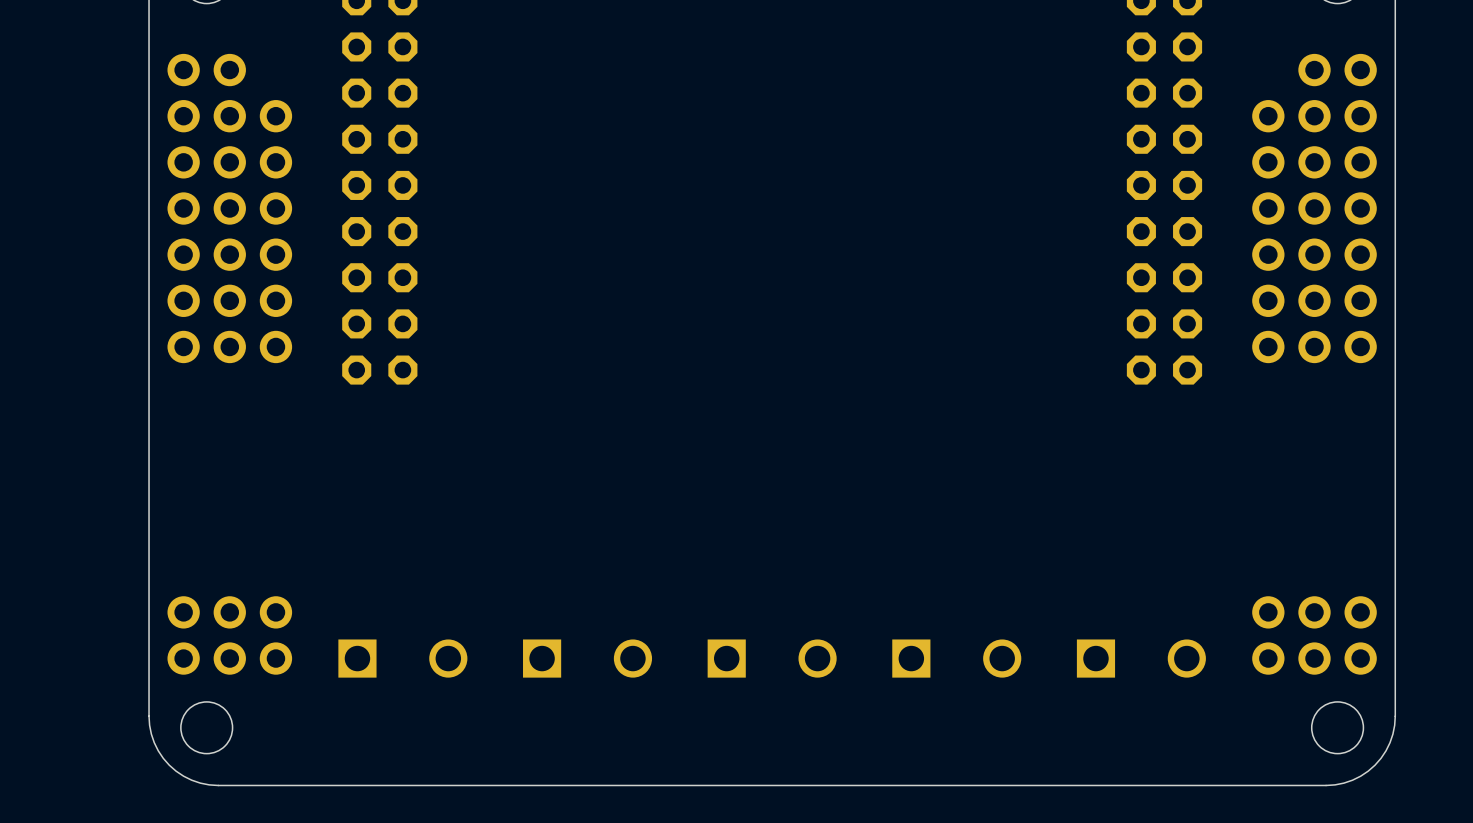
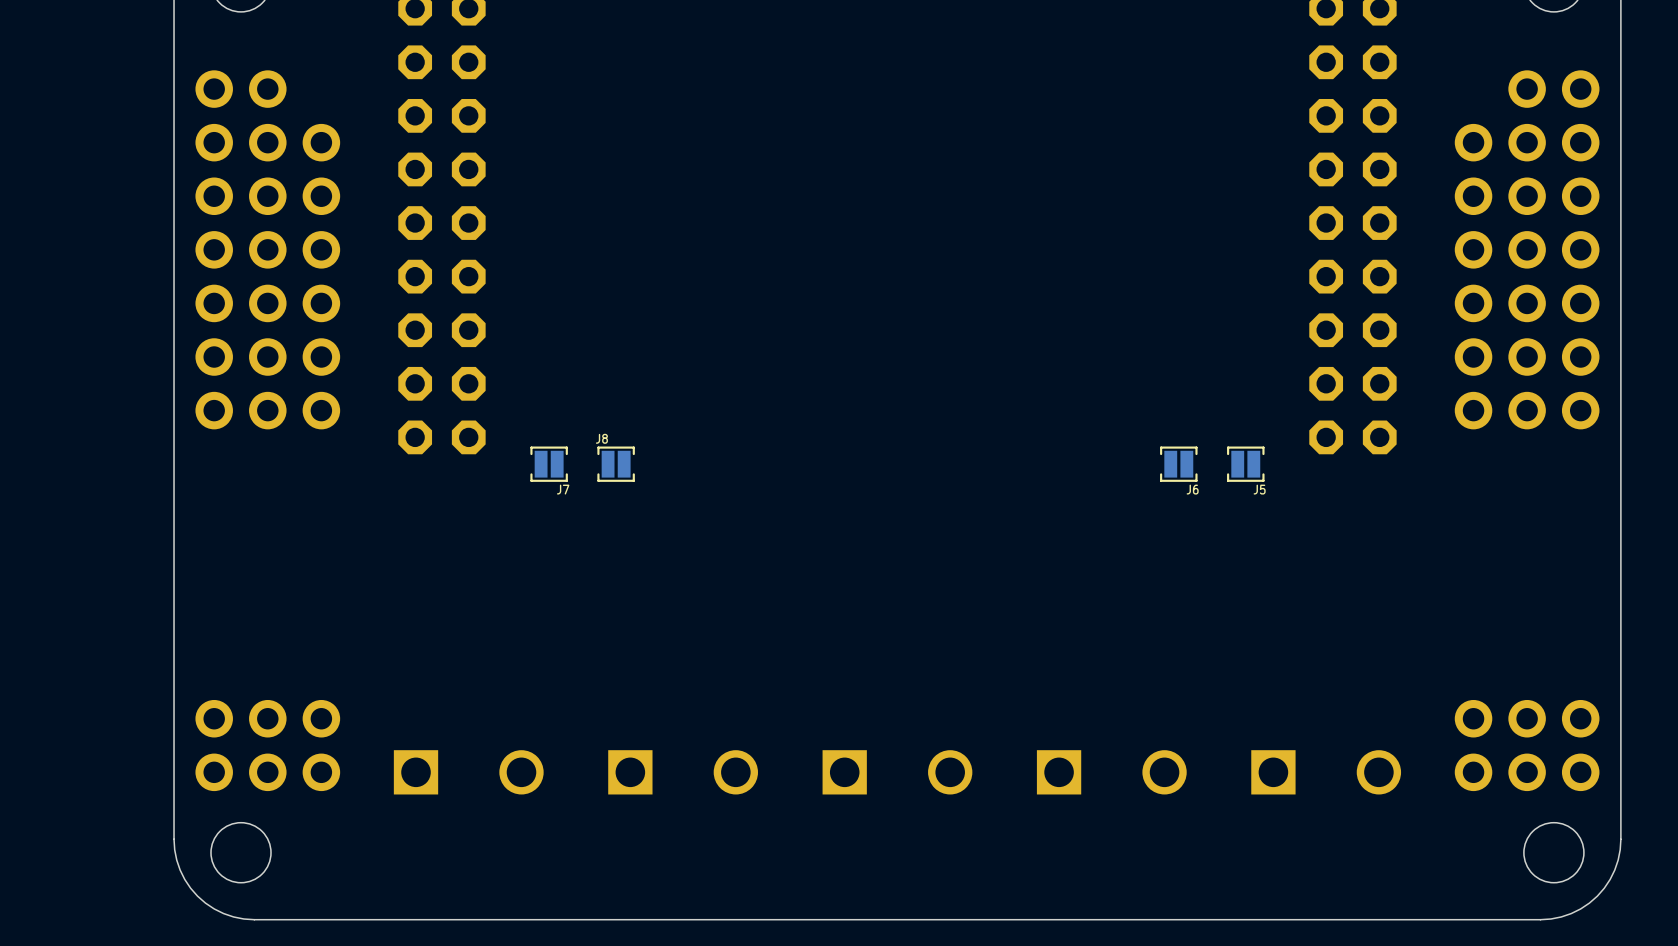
J7: none -> (549, 464)
J8: none -> (616, 464)
J6: none -> (1178, 464)
J5: none -> (1245, 464)

